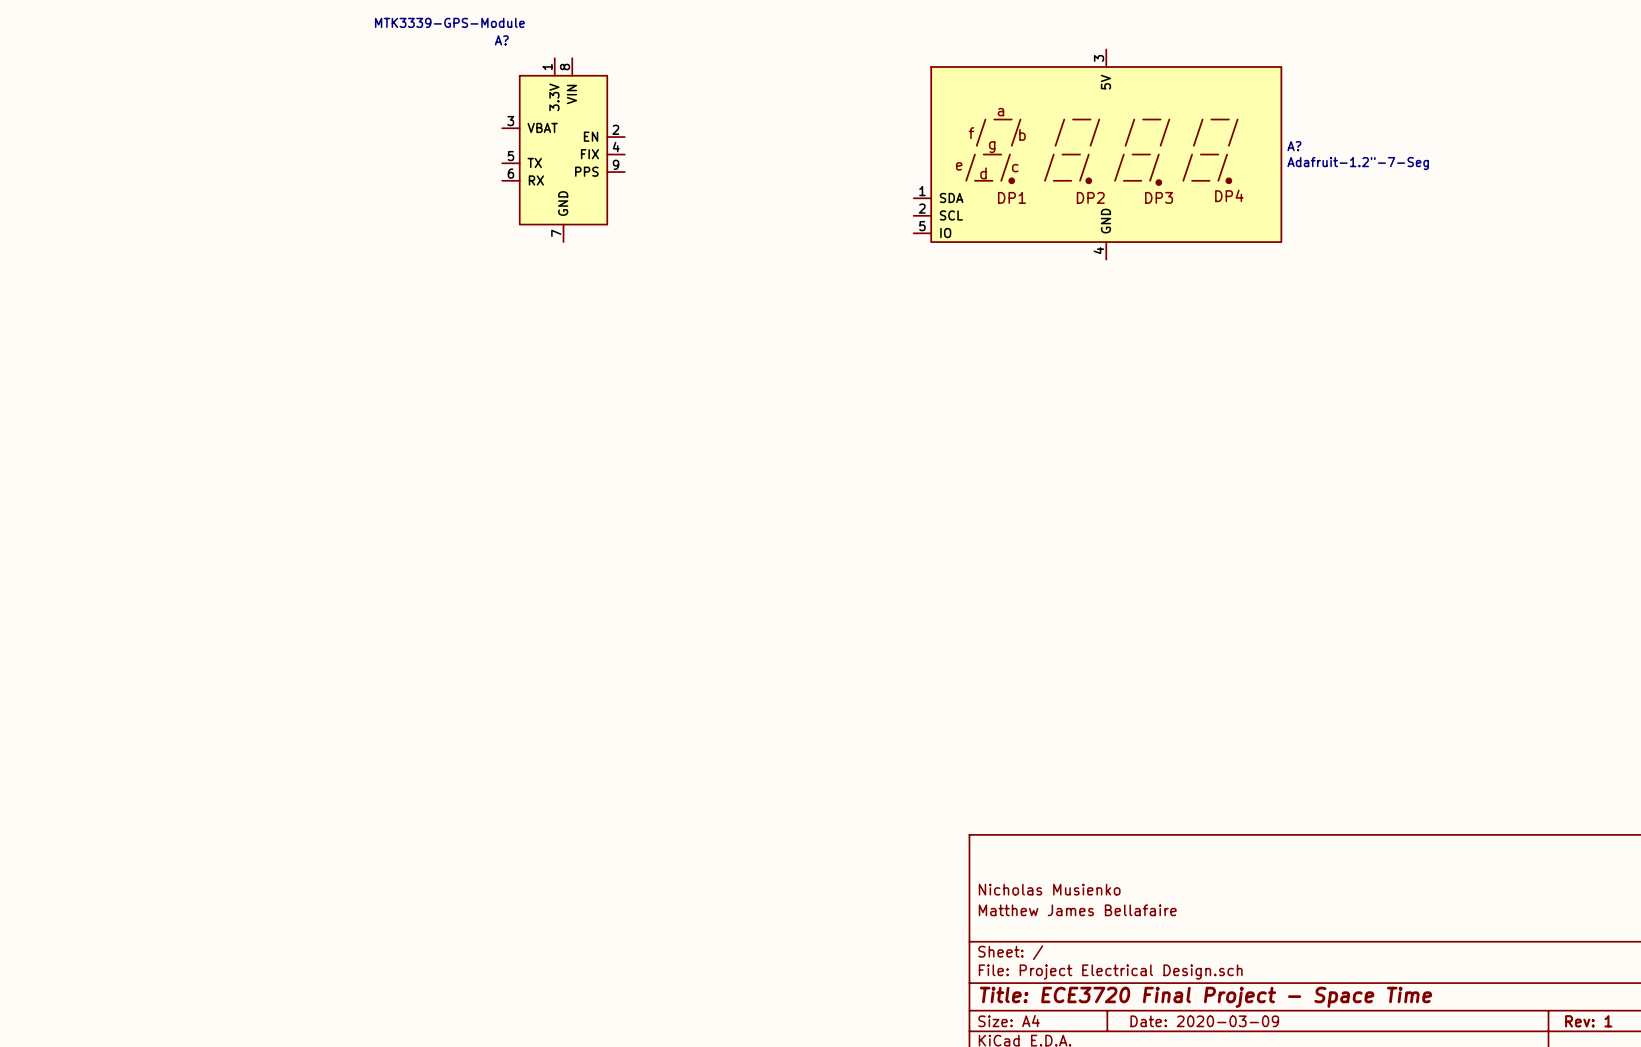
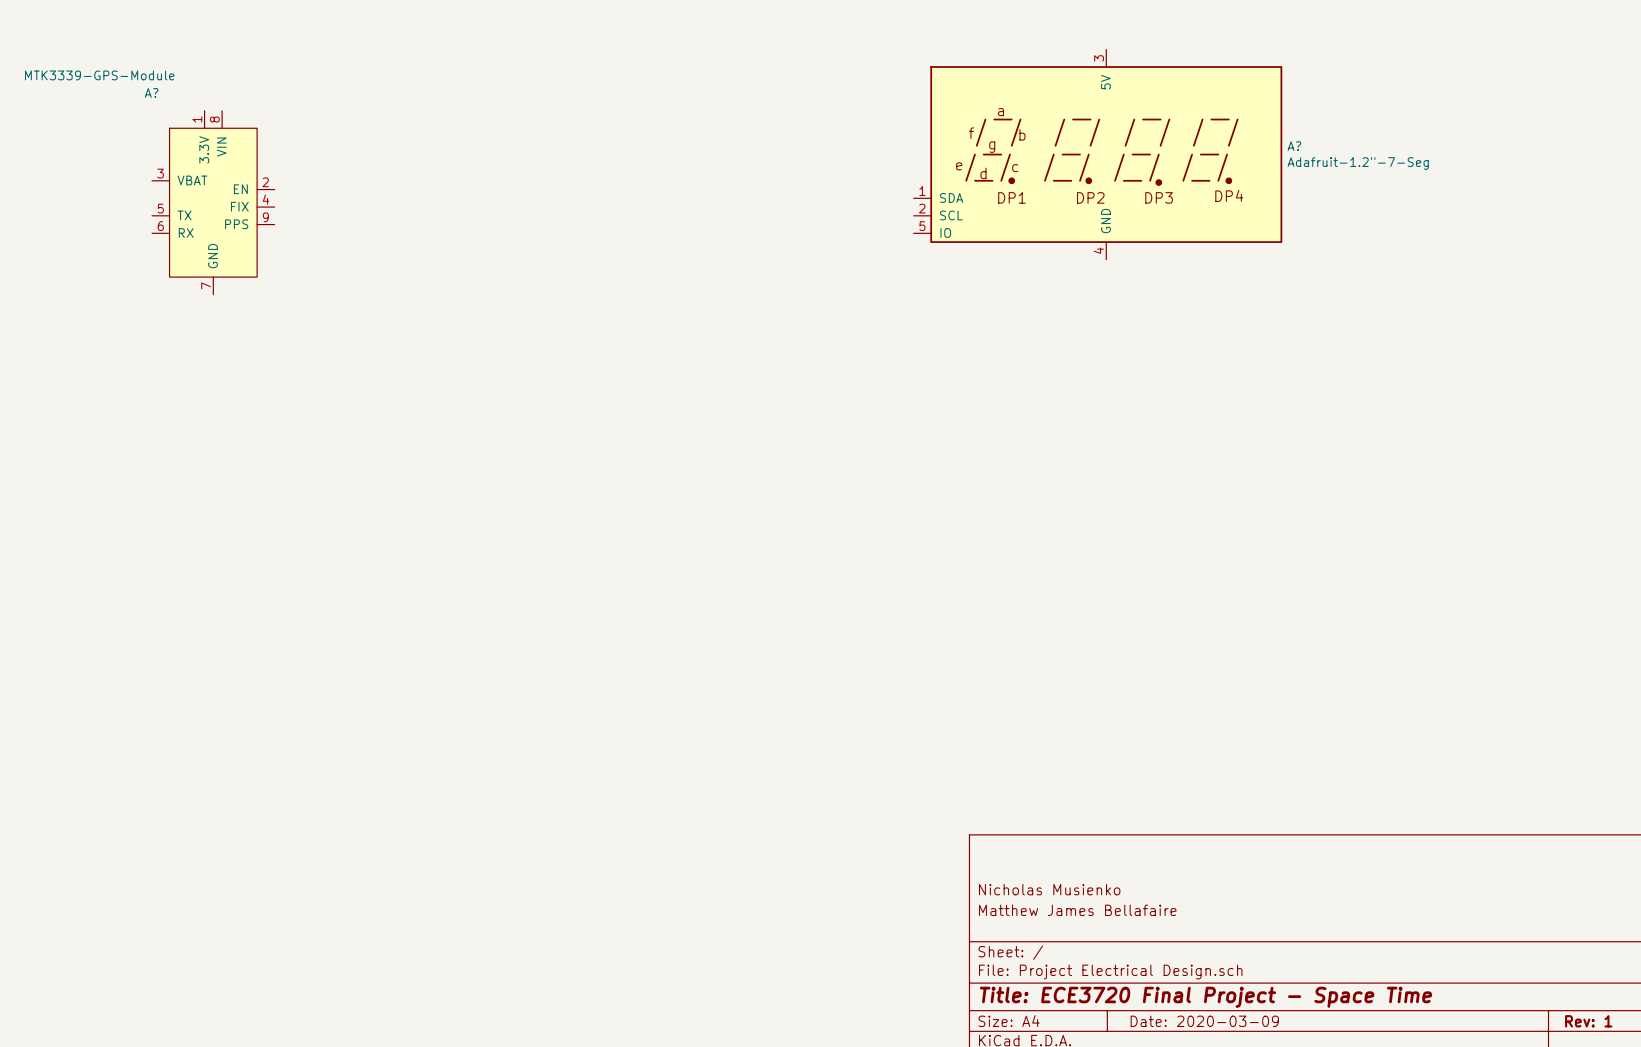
A?: MTK3339-GPS-Module (563, 150) -> none
A?: none -> MTK3339-GPS-Module (213, 202)

